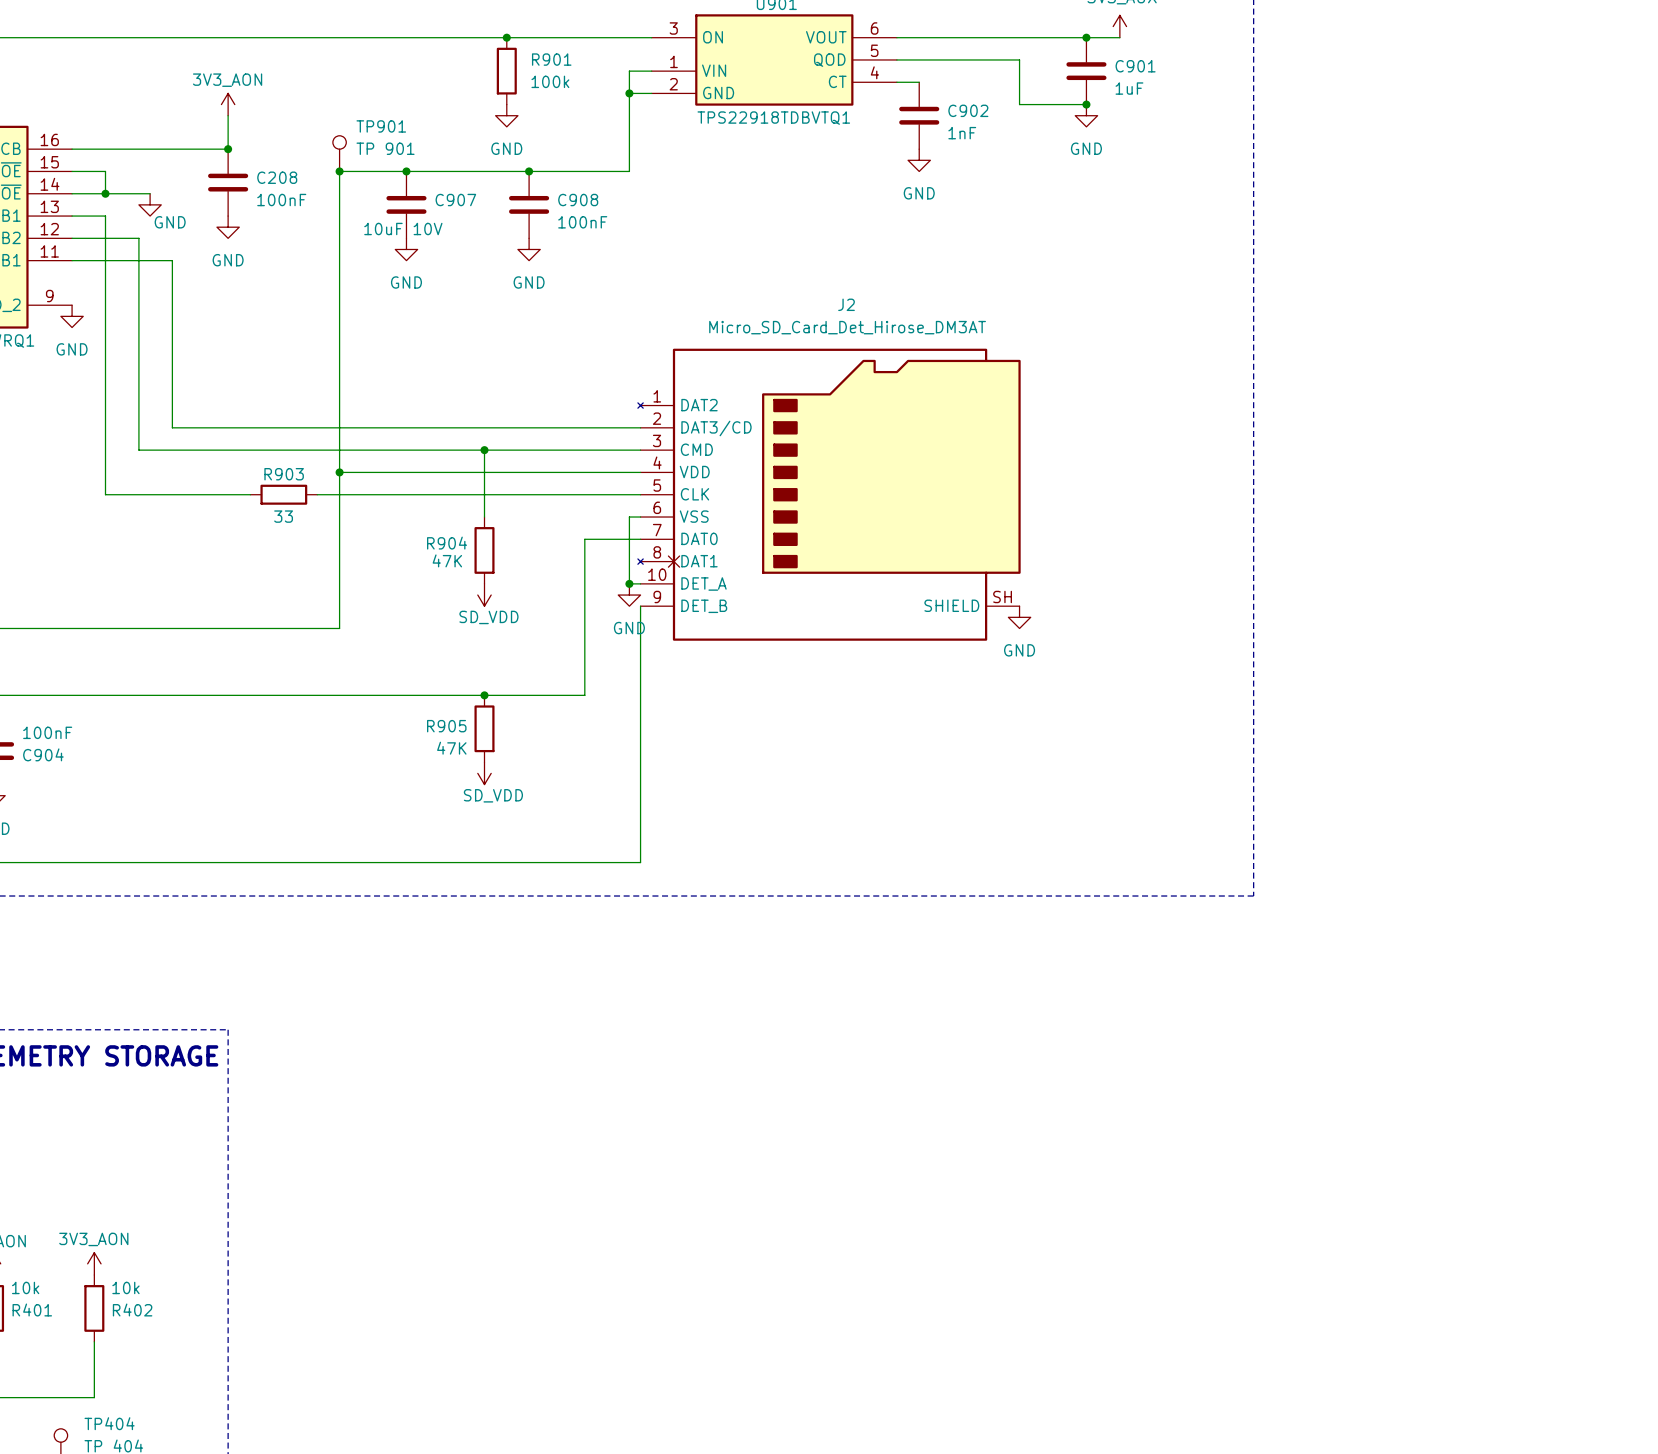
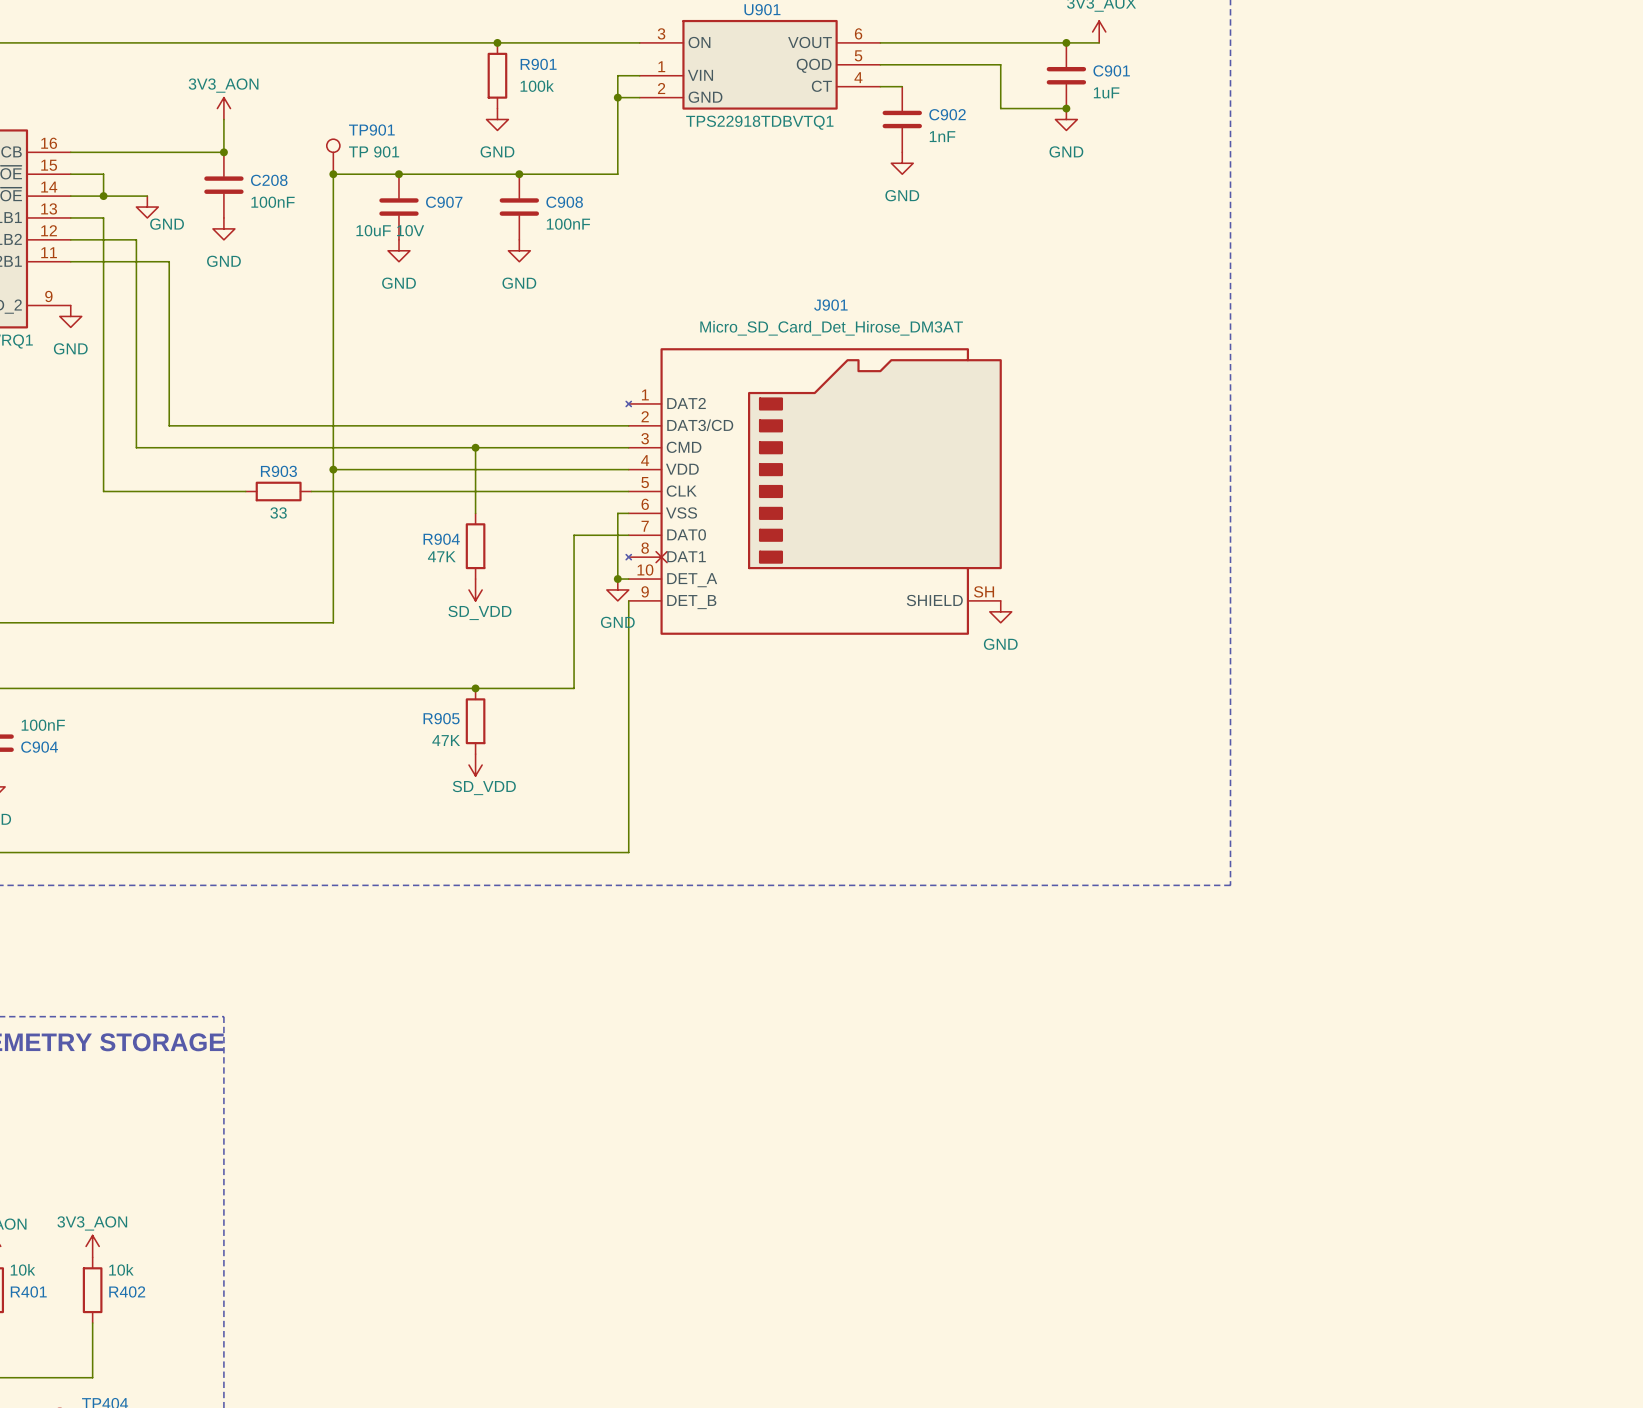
J2 name: J2 (846, 304) -> J901 (830, 305)

